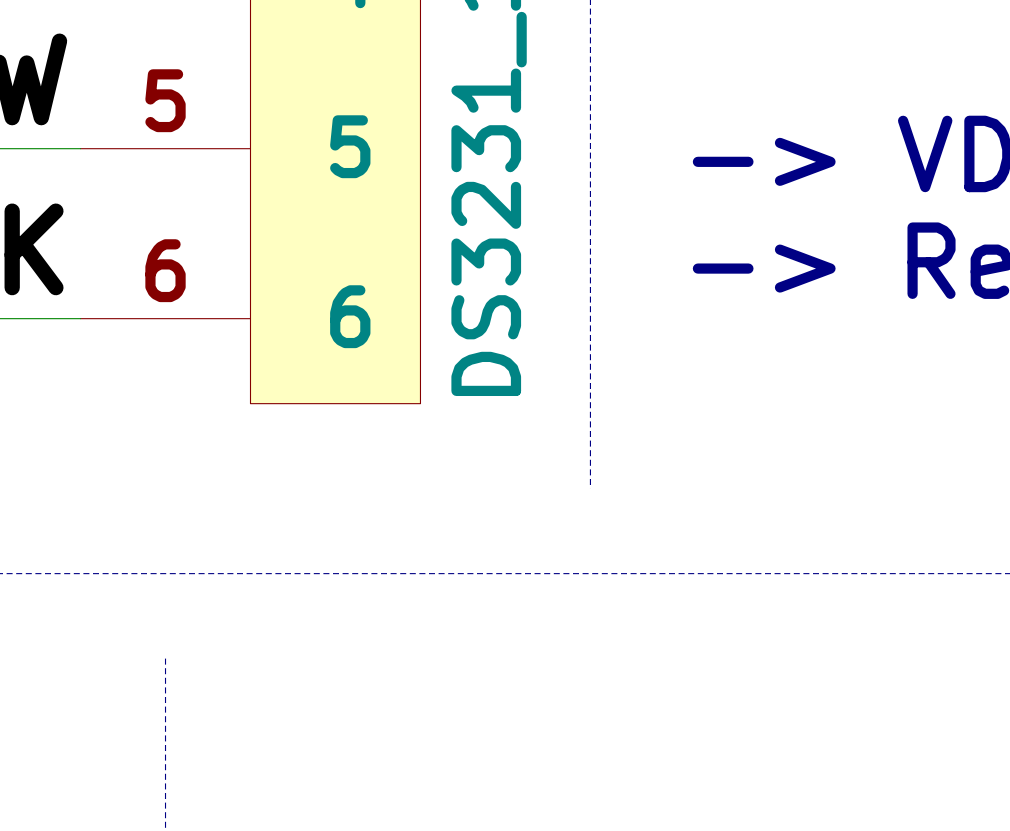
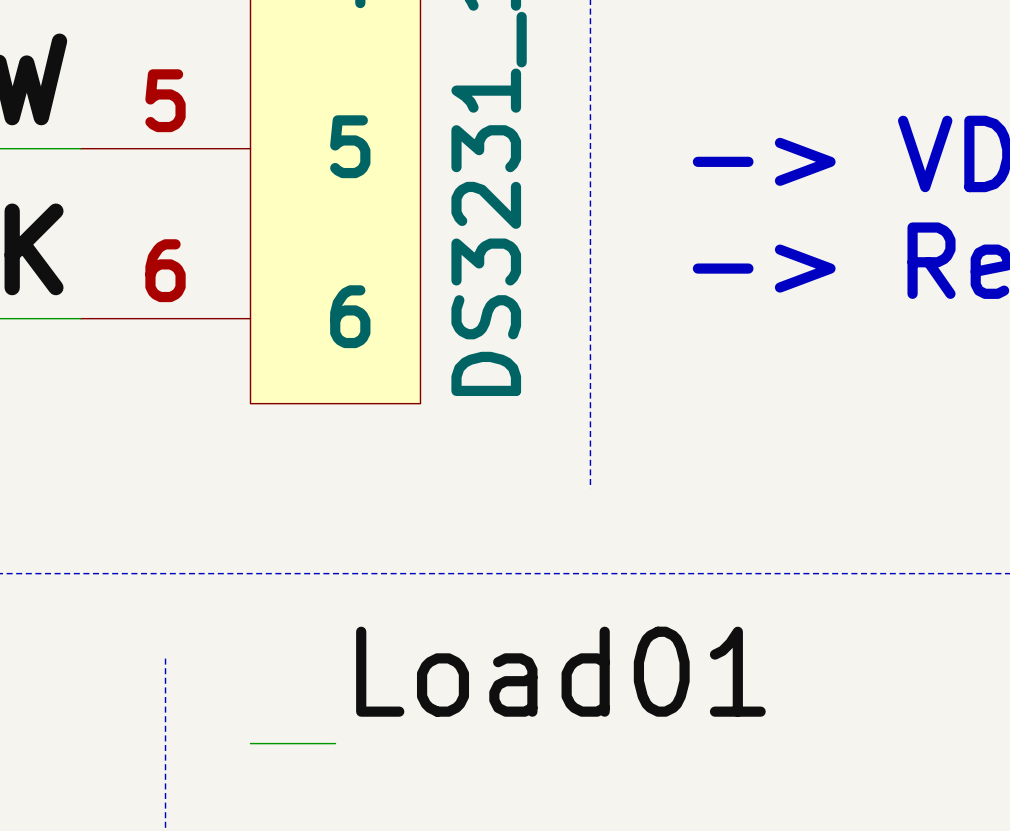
label: none -> Load01 (560, 671)
wire: none -> (250, 743) (335, 743)

